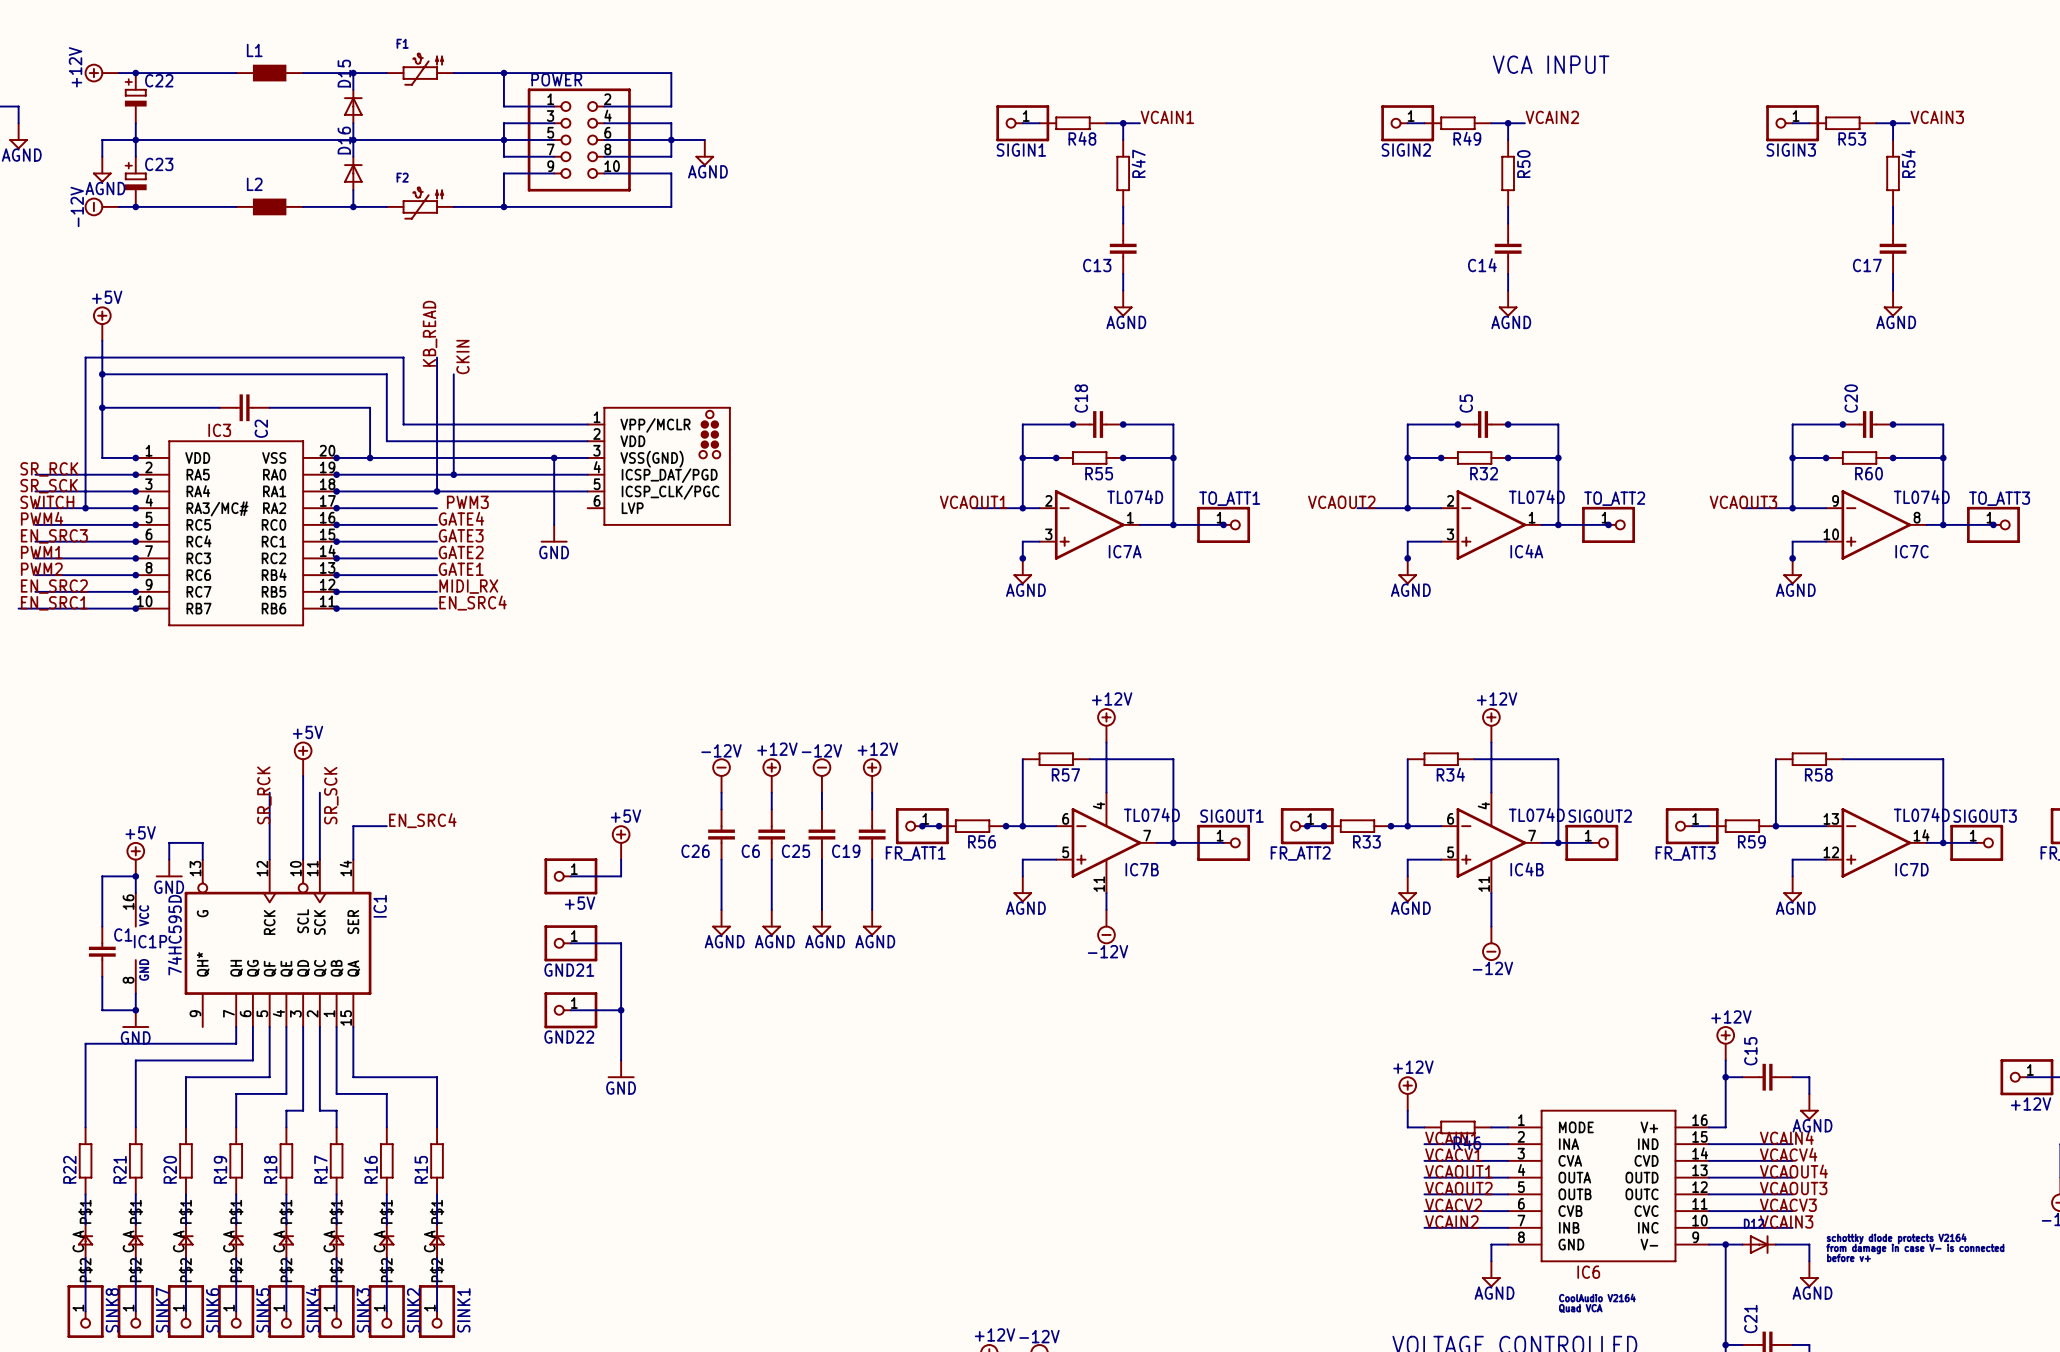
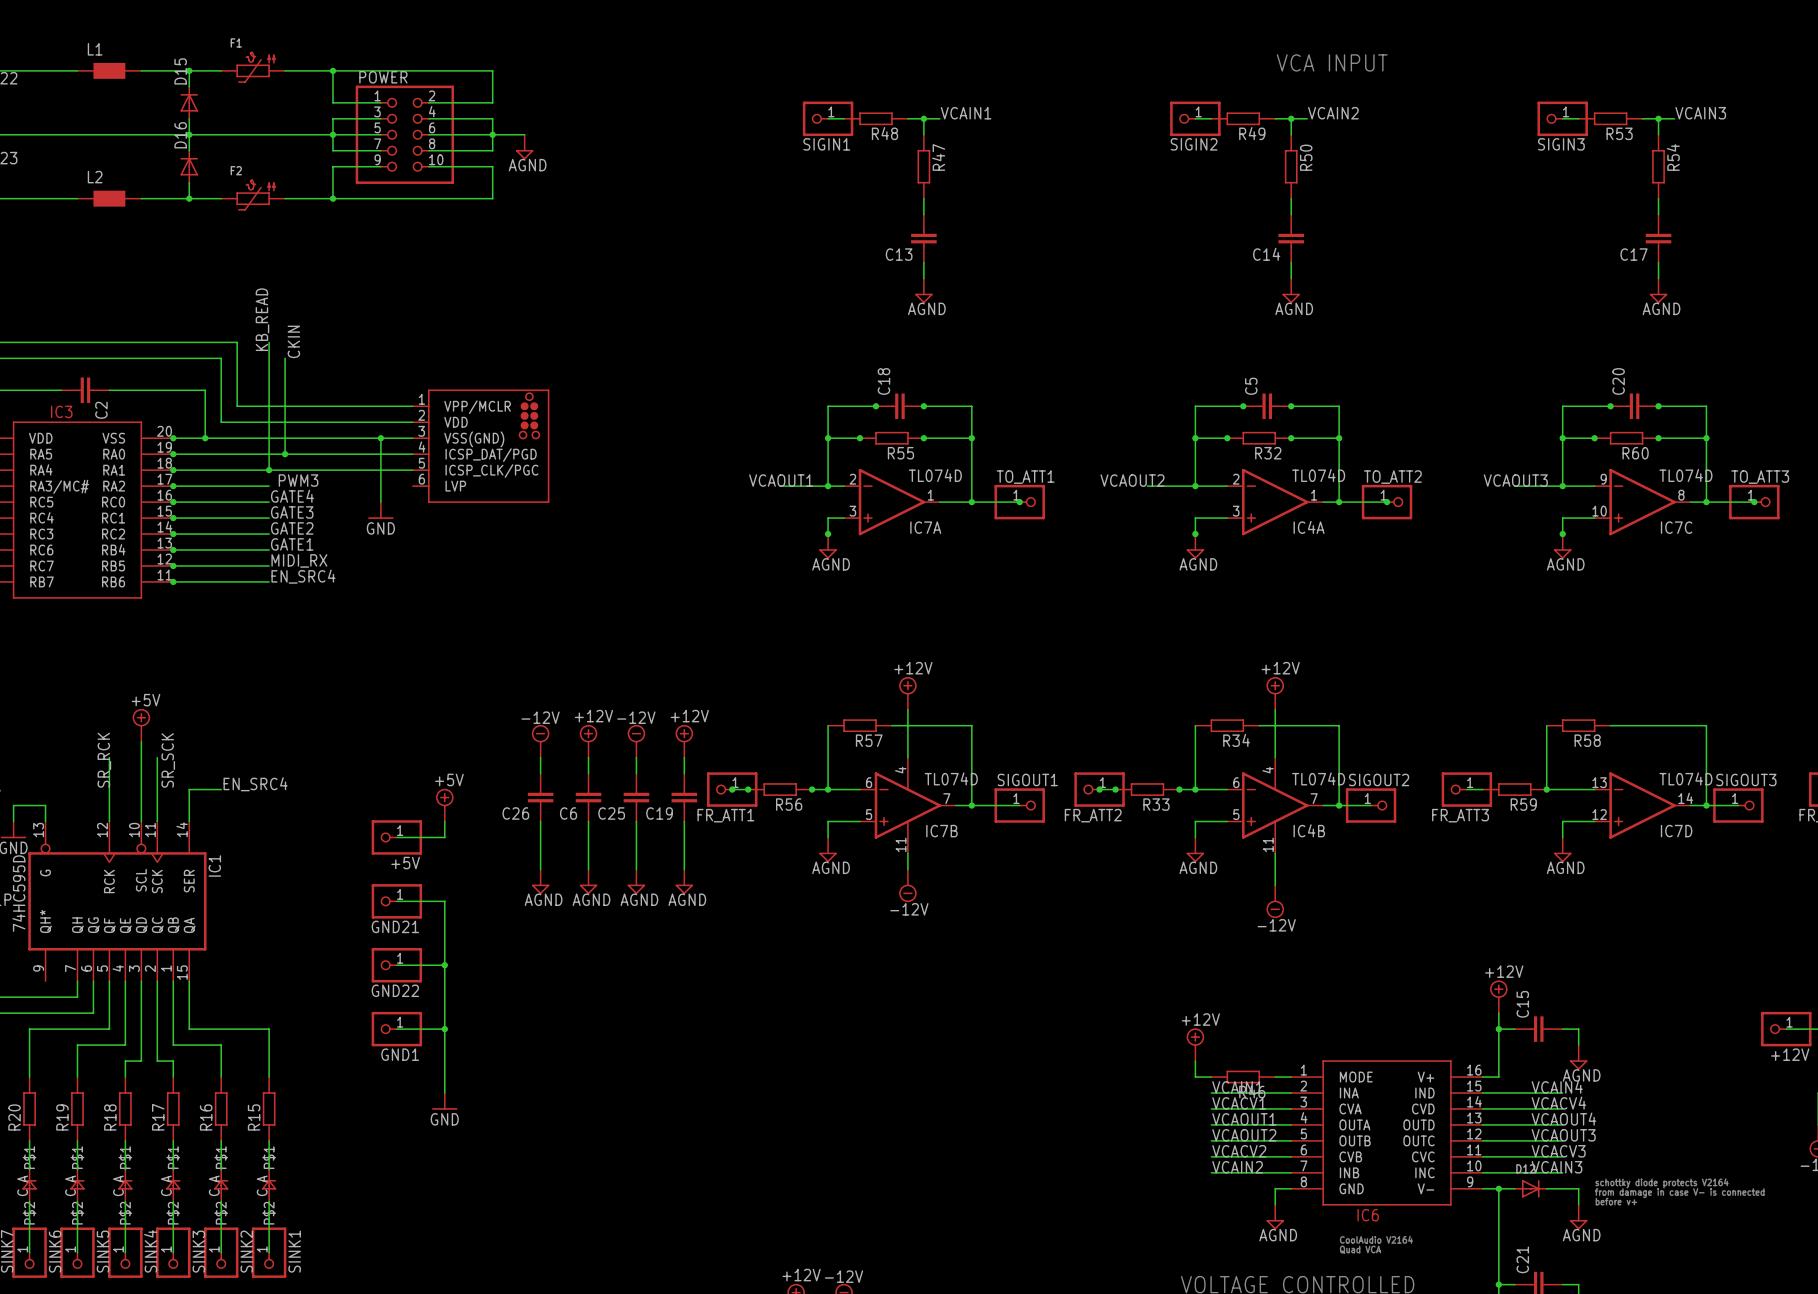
wire: none -> (444, 1013) (444, 1093)
power symbol position: GND (621, 1069) -> GND (444, 1101)
wire: none -> (396, 1029) (444, 1029)
GND1: none -> (396, 1029)
junction: none -> (444, 1029)

